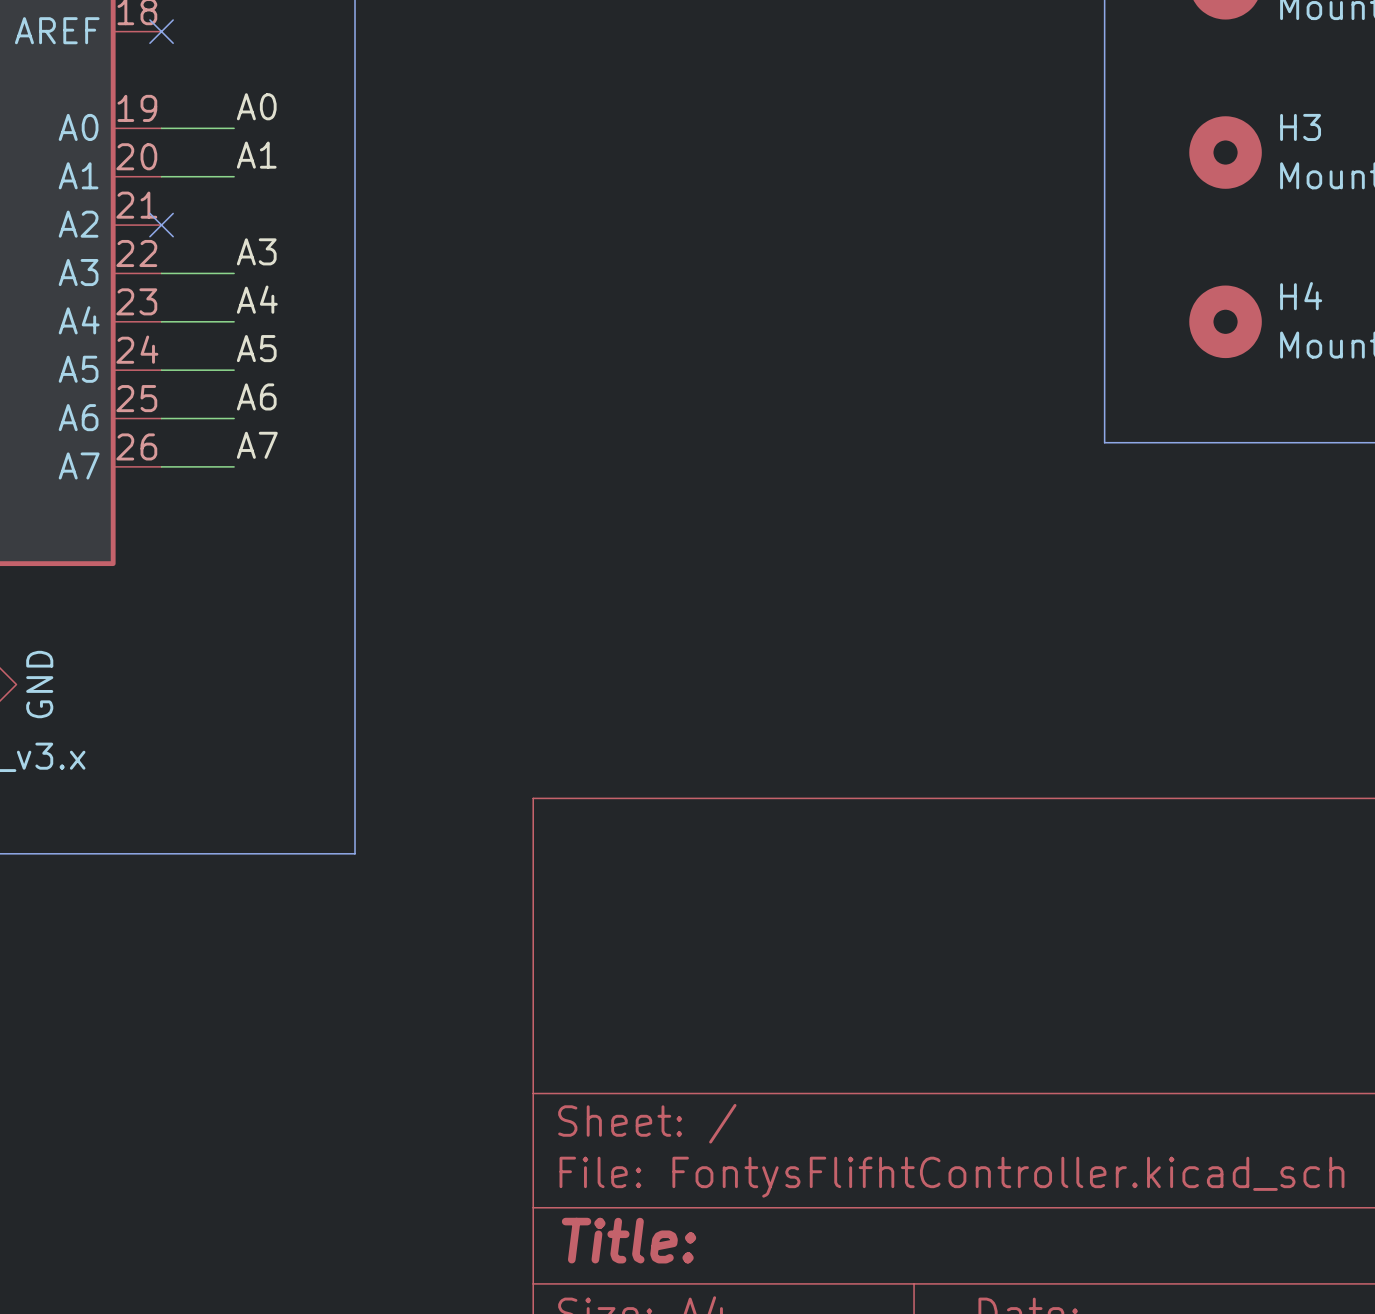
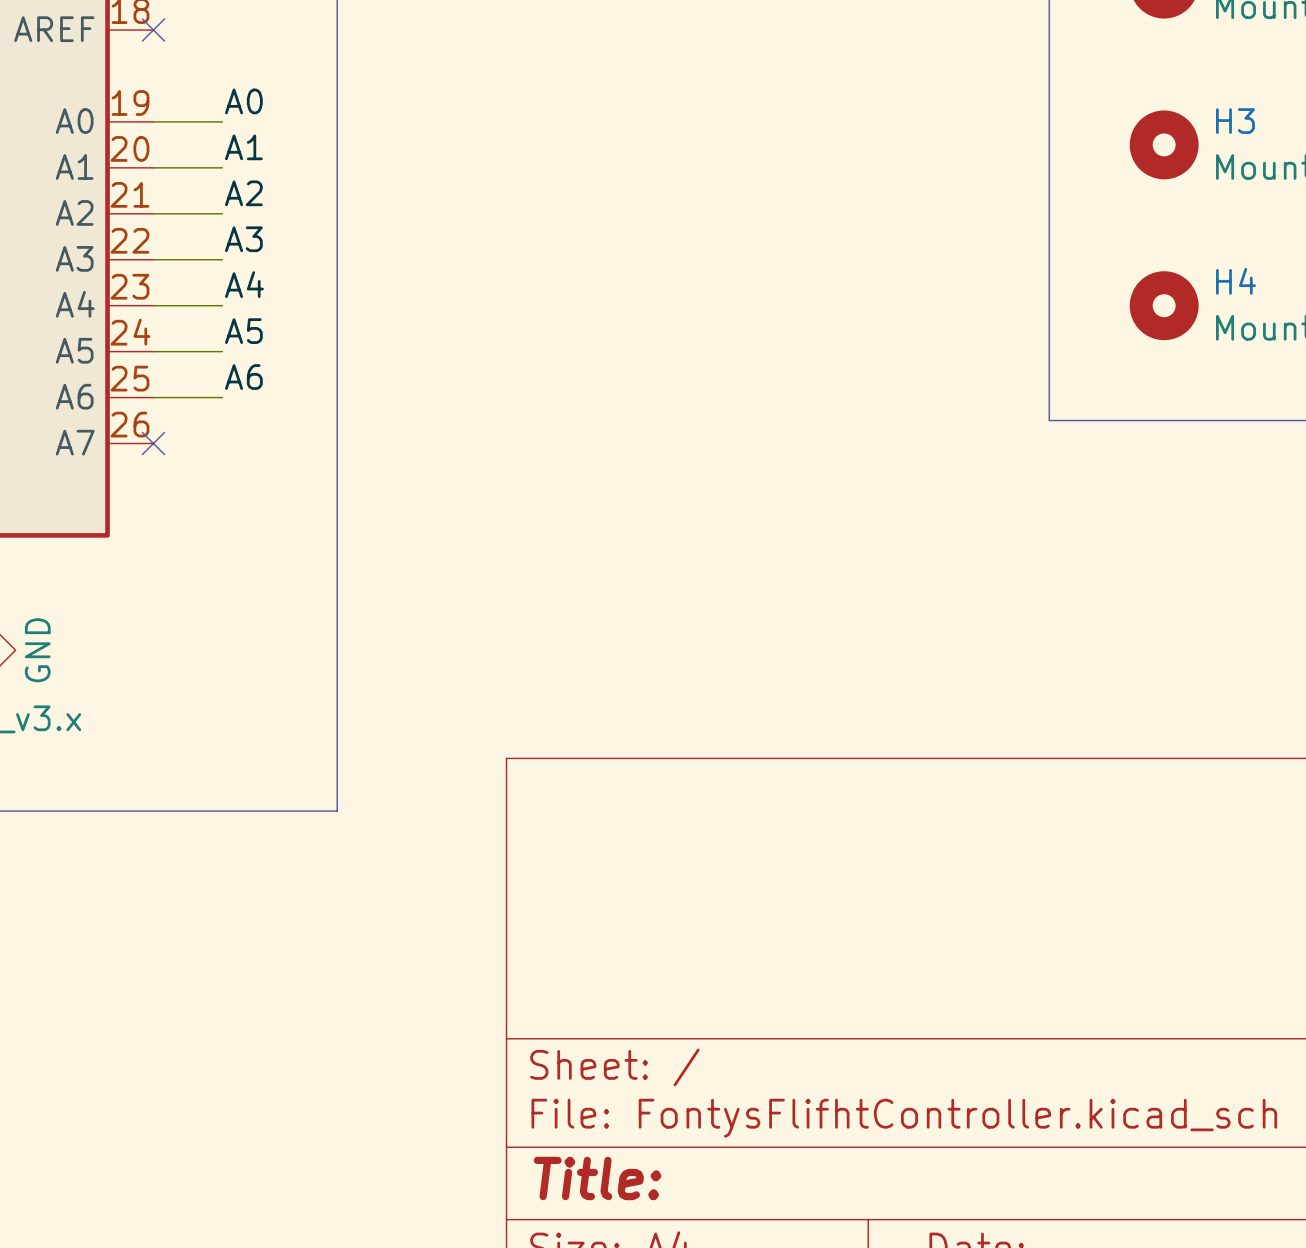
label: none -> A2 (243, 193)
no-connect mark: (161, 225) -> none
label: A7 (257, 445) -> none
wire: (161, 466) (234, 466) -> (153, 213) (222, 213)
no-connect mark: none -> (153, 443)

